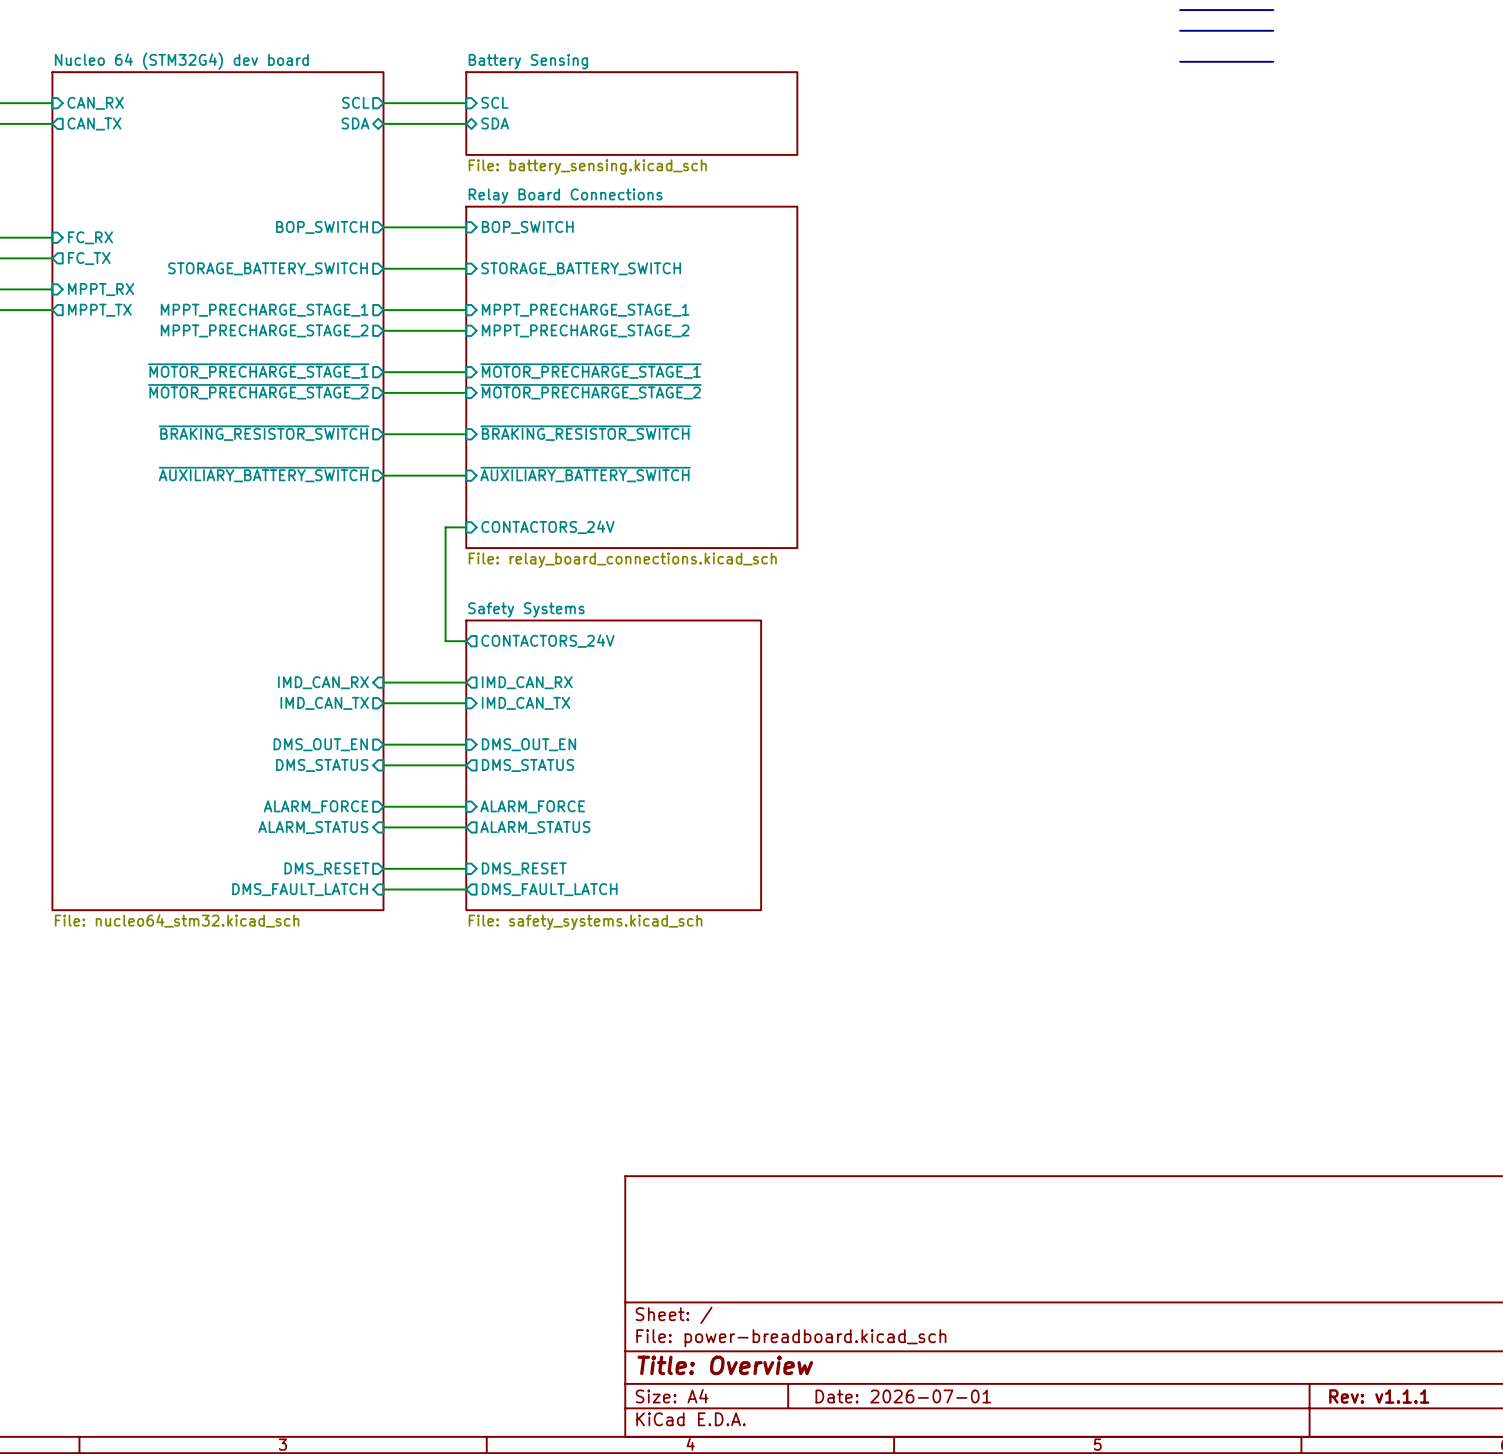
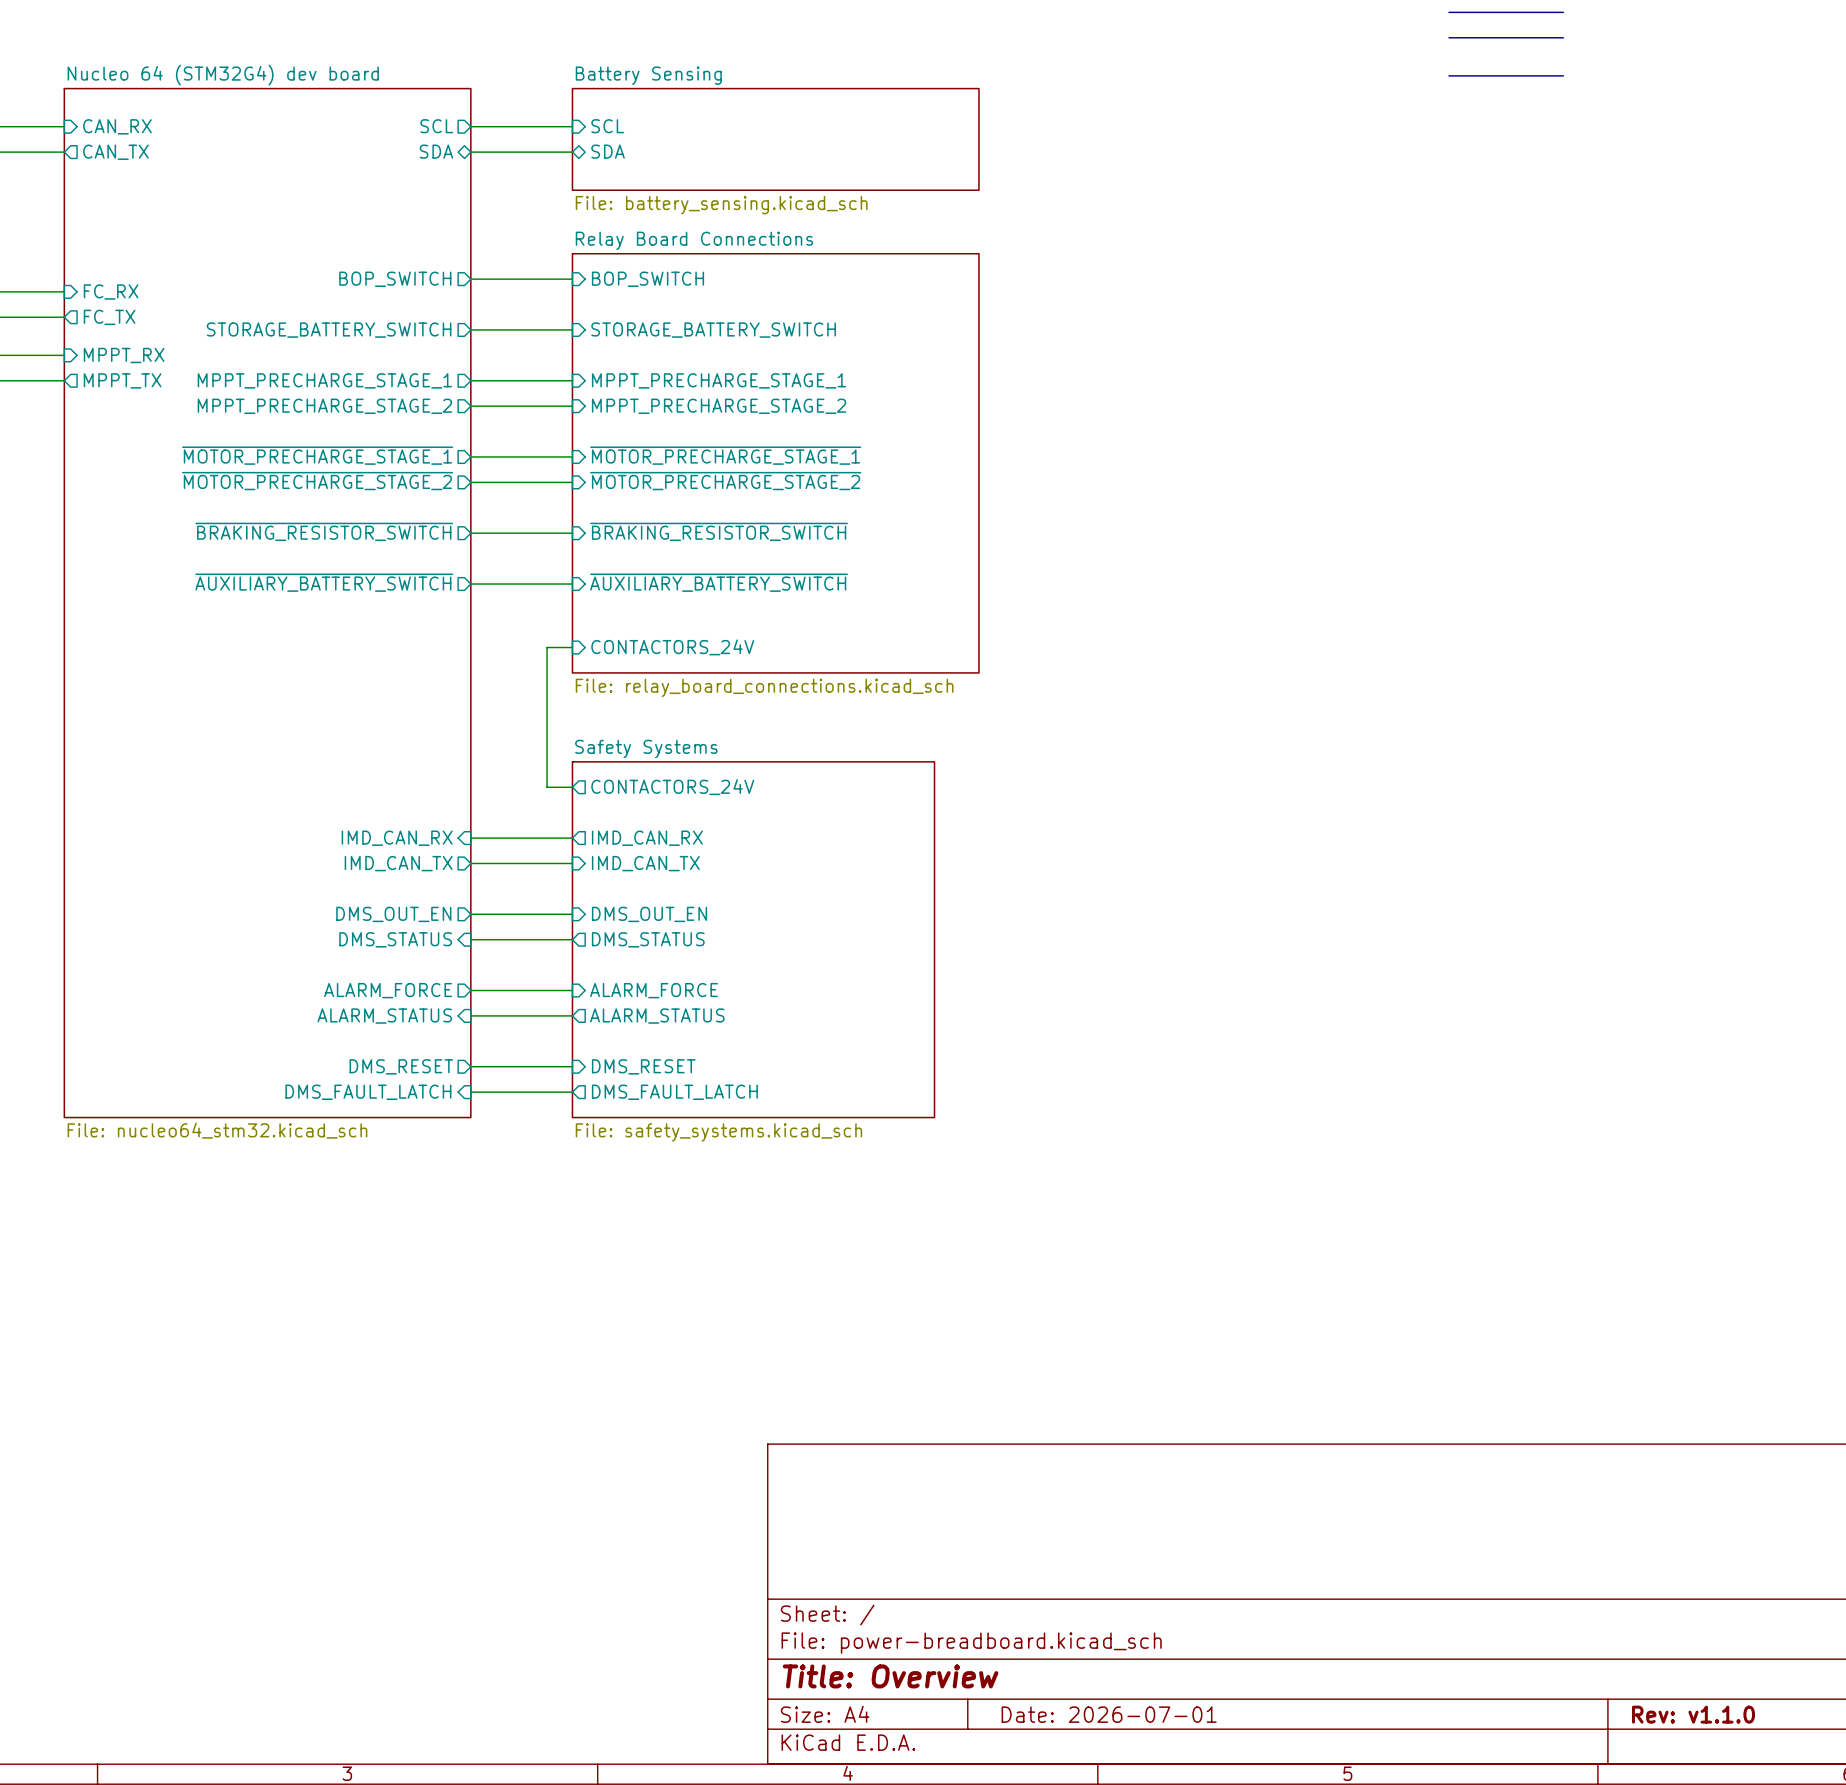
title block: Rev: v1.1.1 (1379, 1396) -> Rev: v1.1.0 (1693, 1714)

